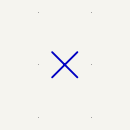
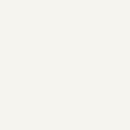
no-connect mark: (64, 64) -> none

